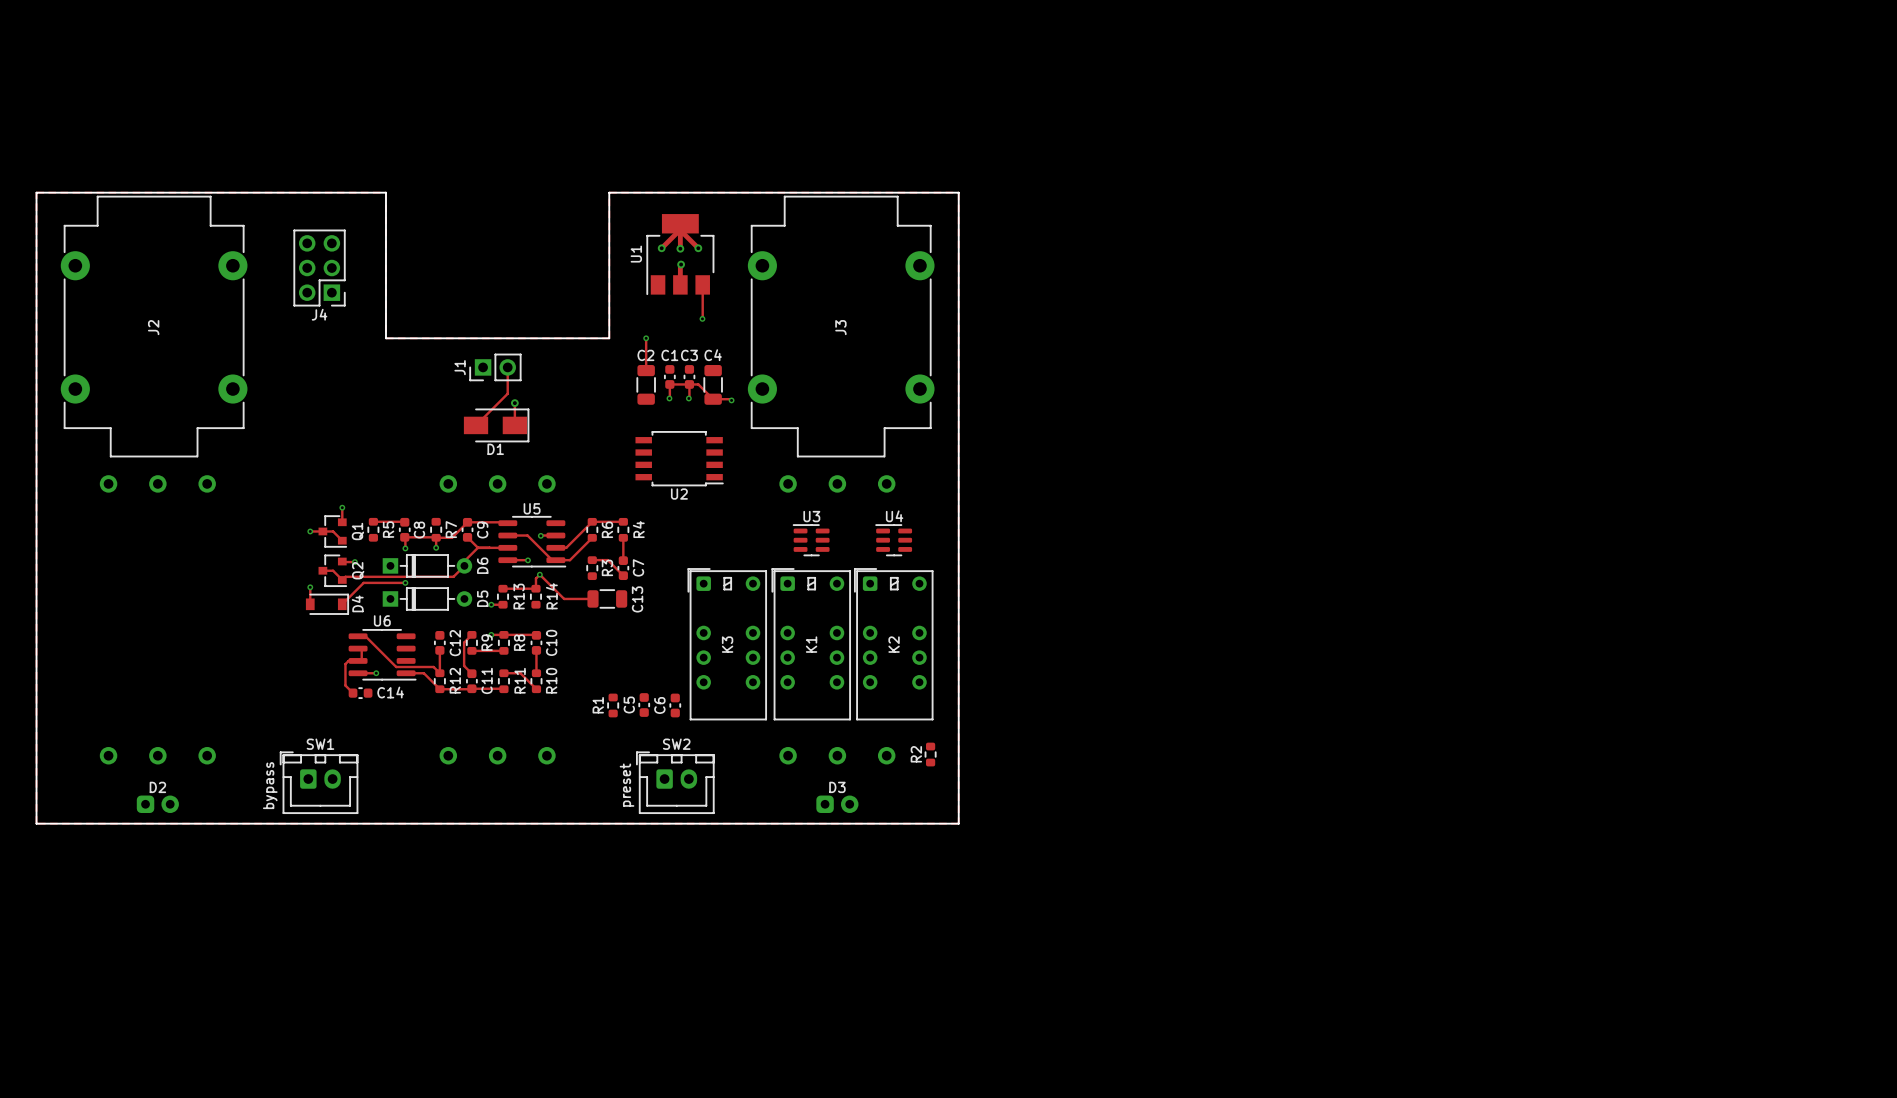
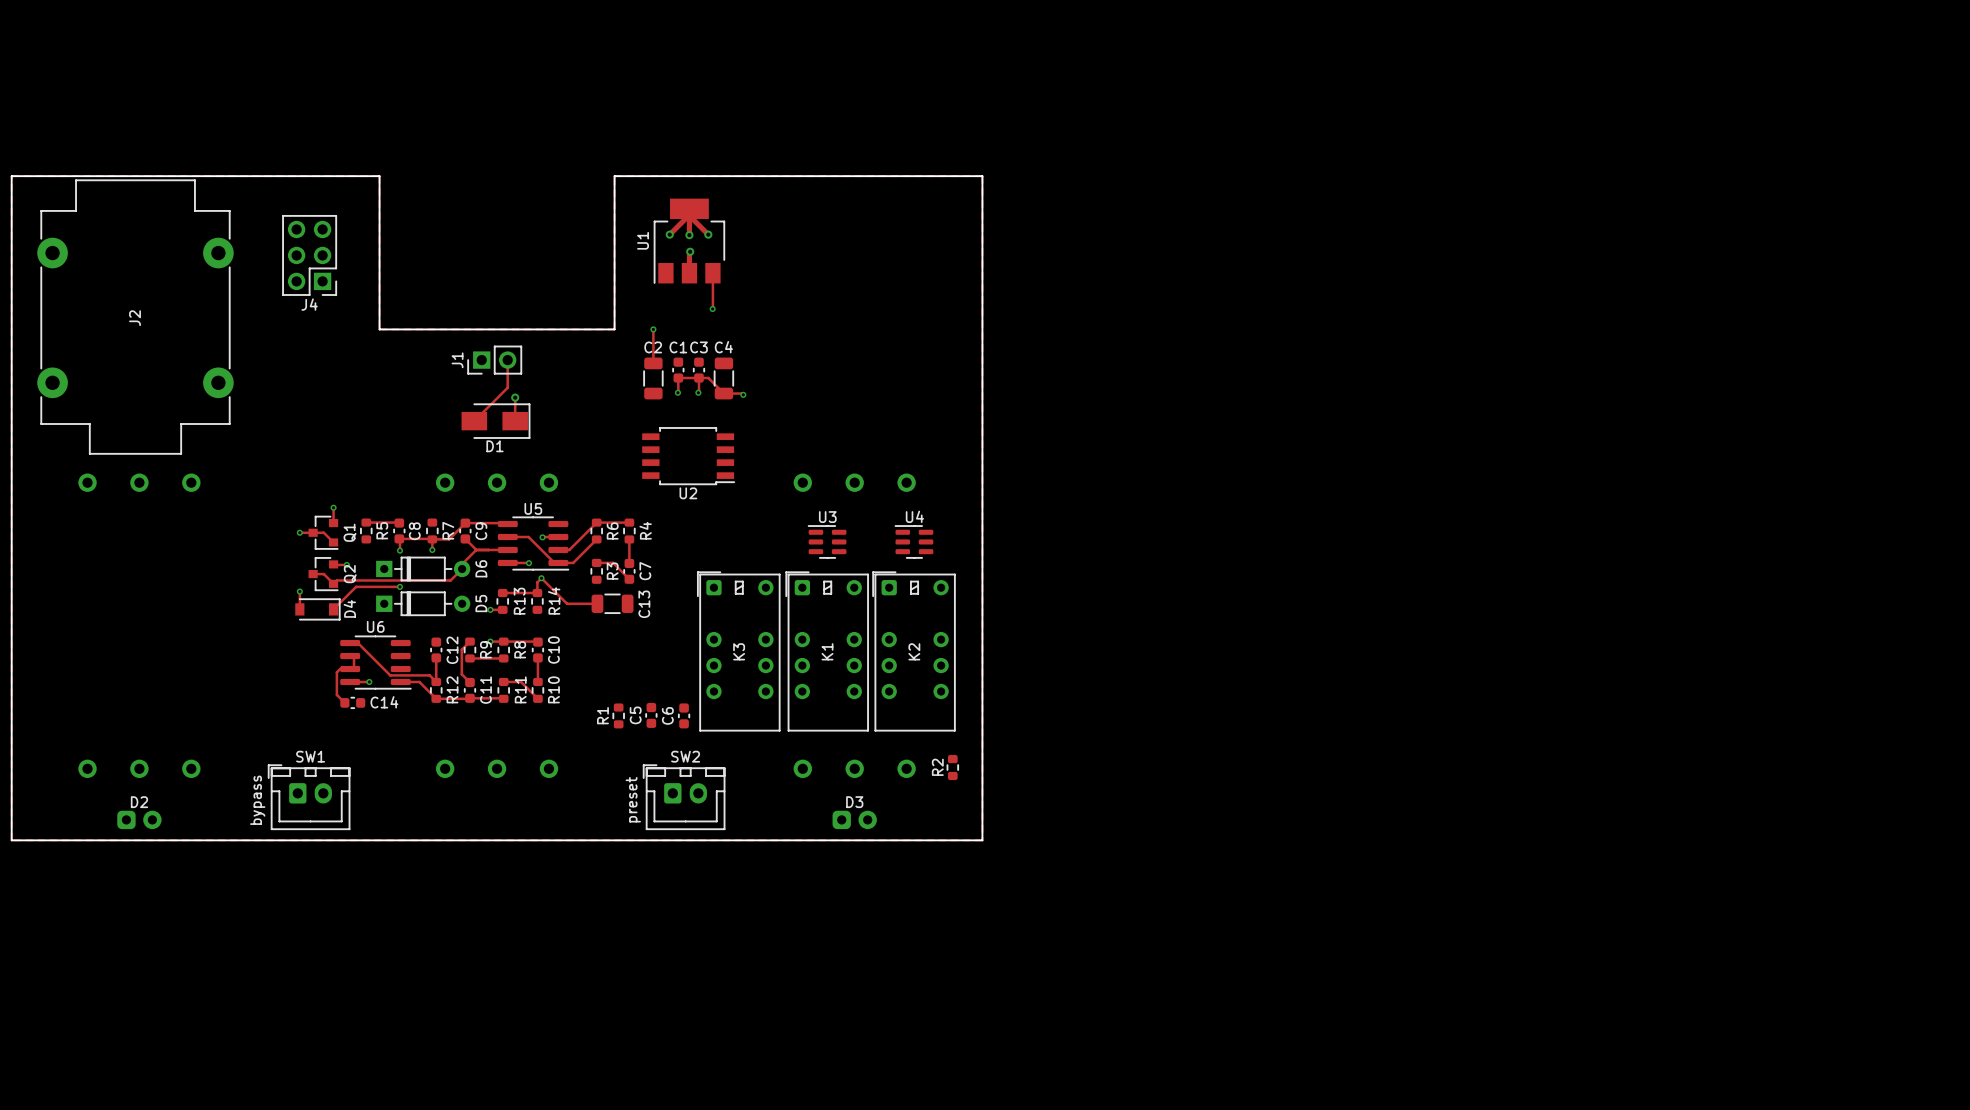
J3: (841, 326) -> none

